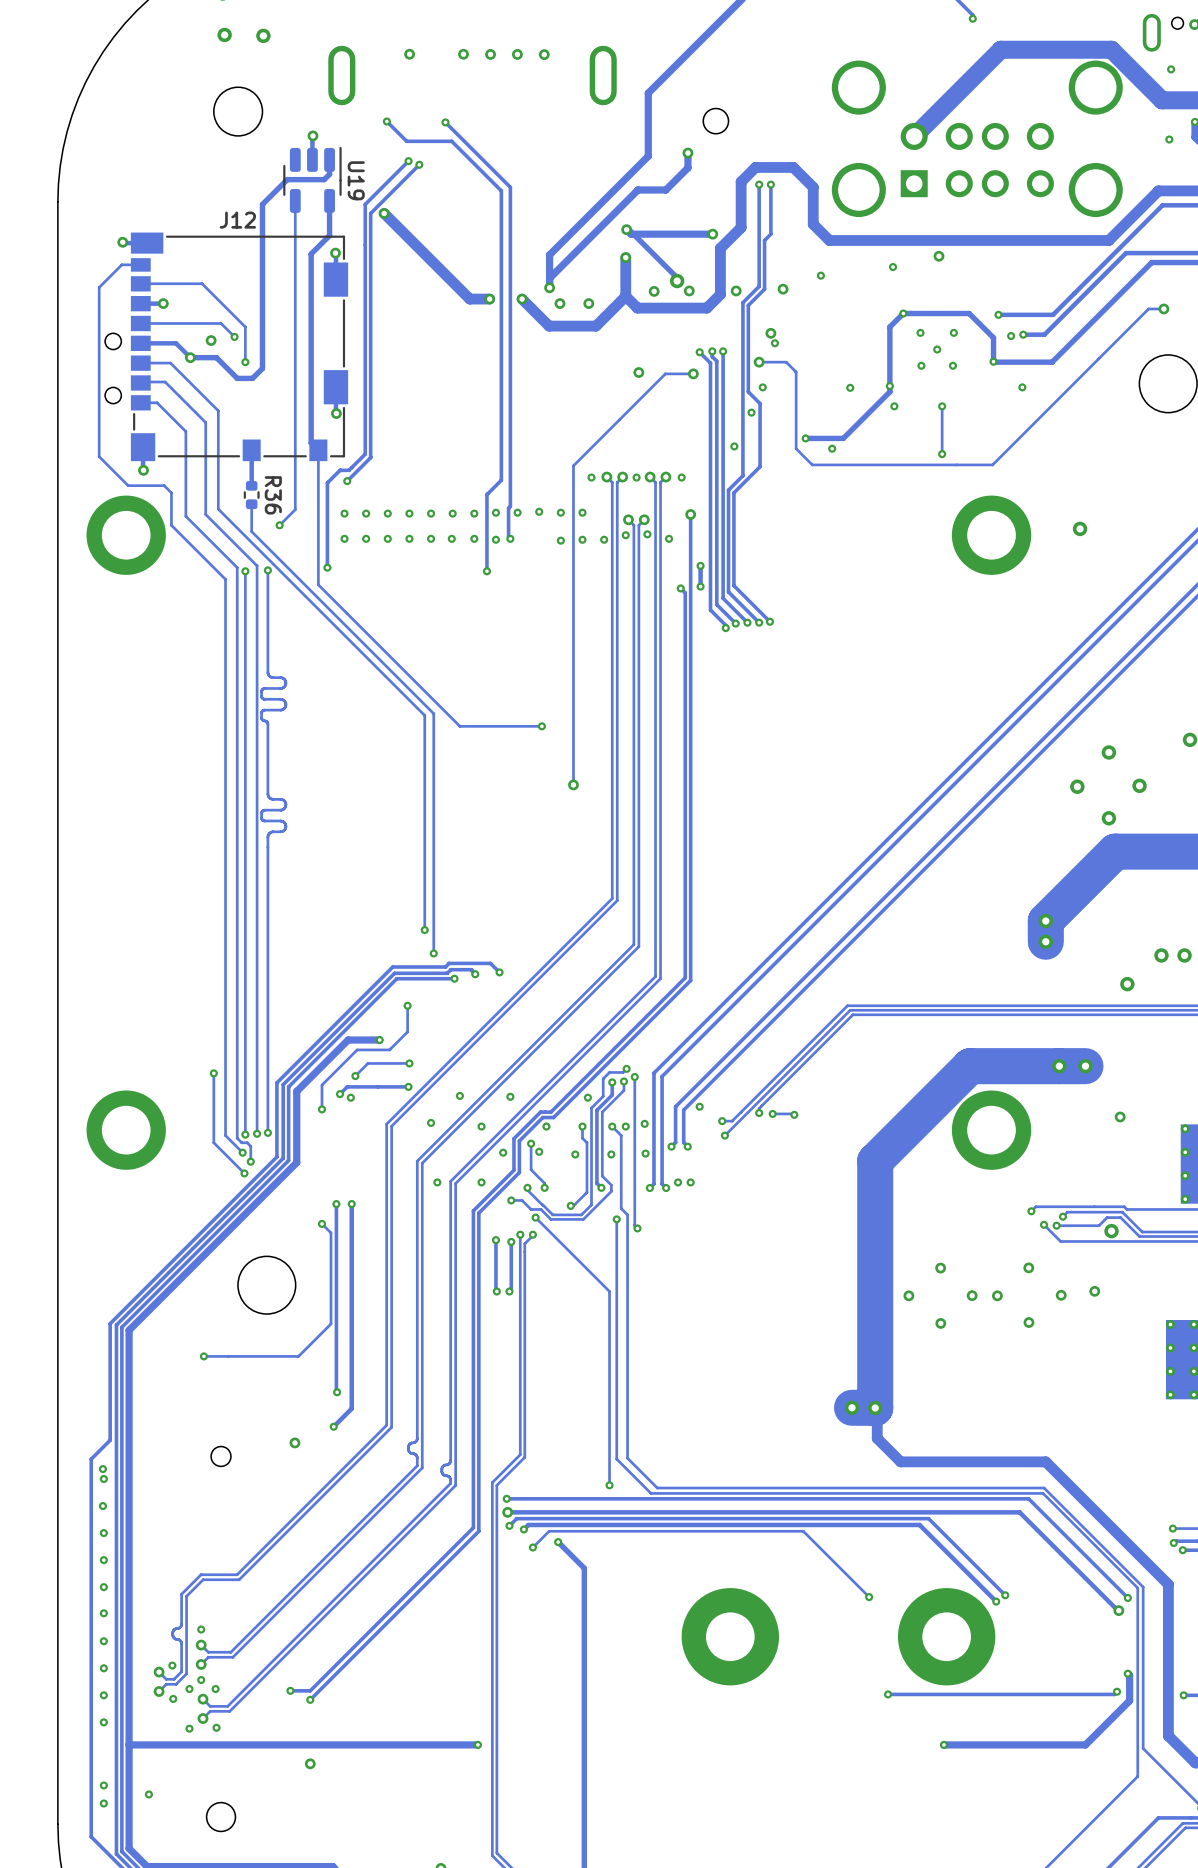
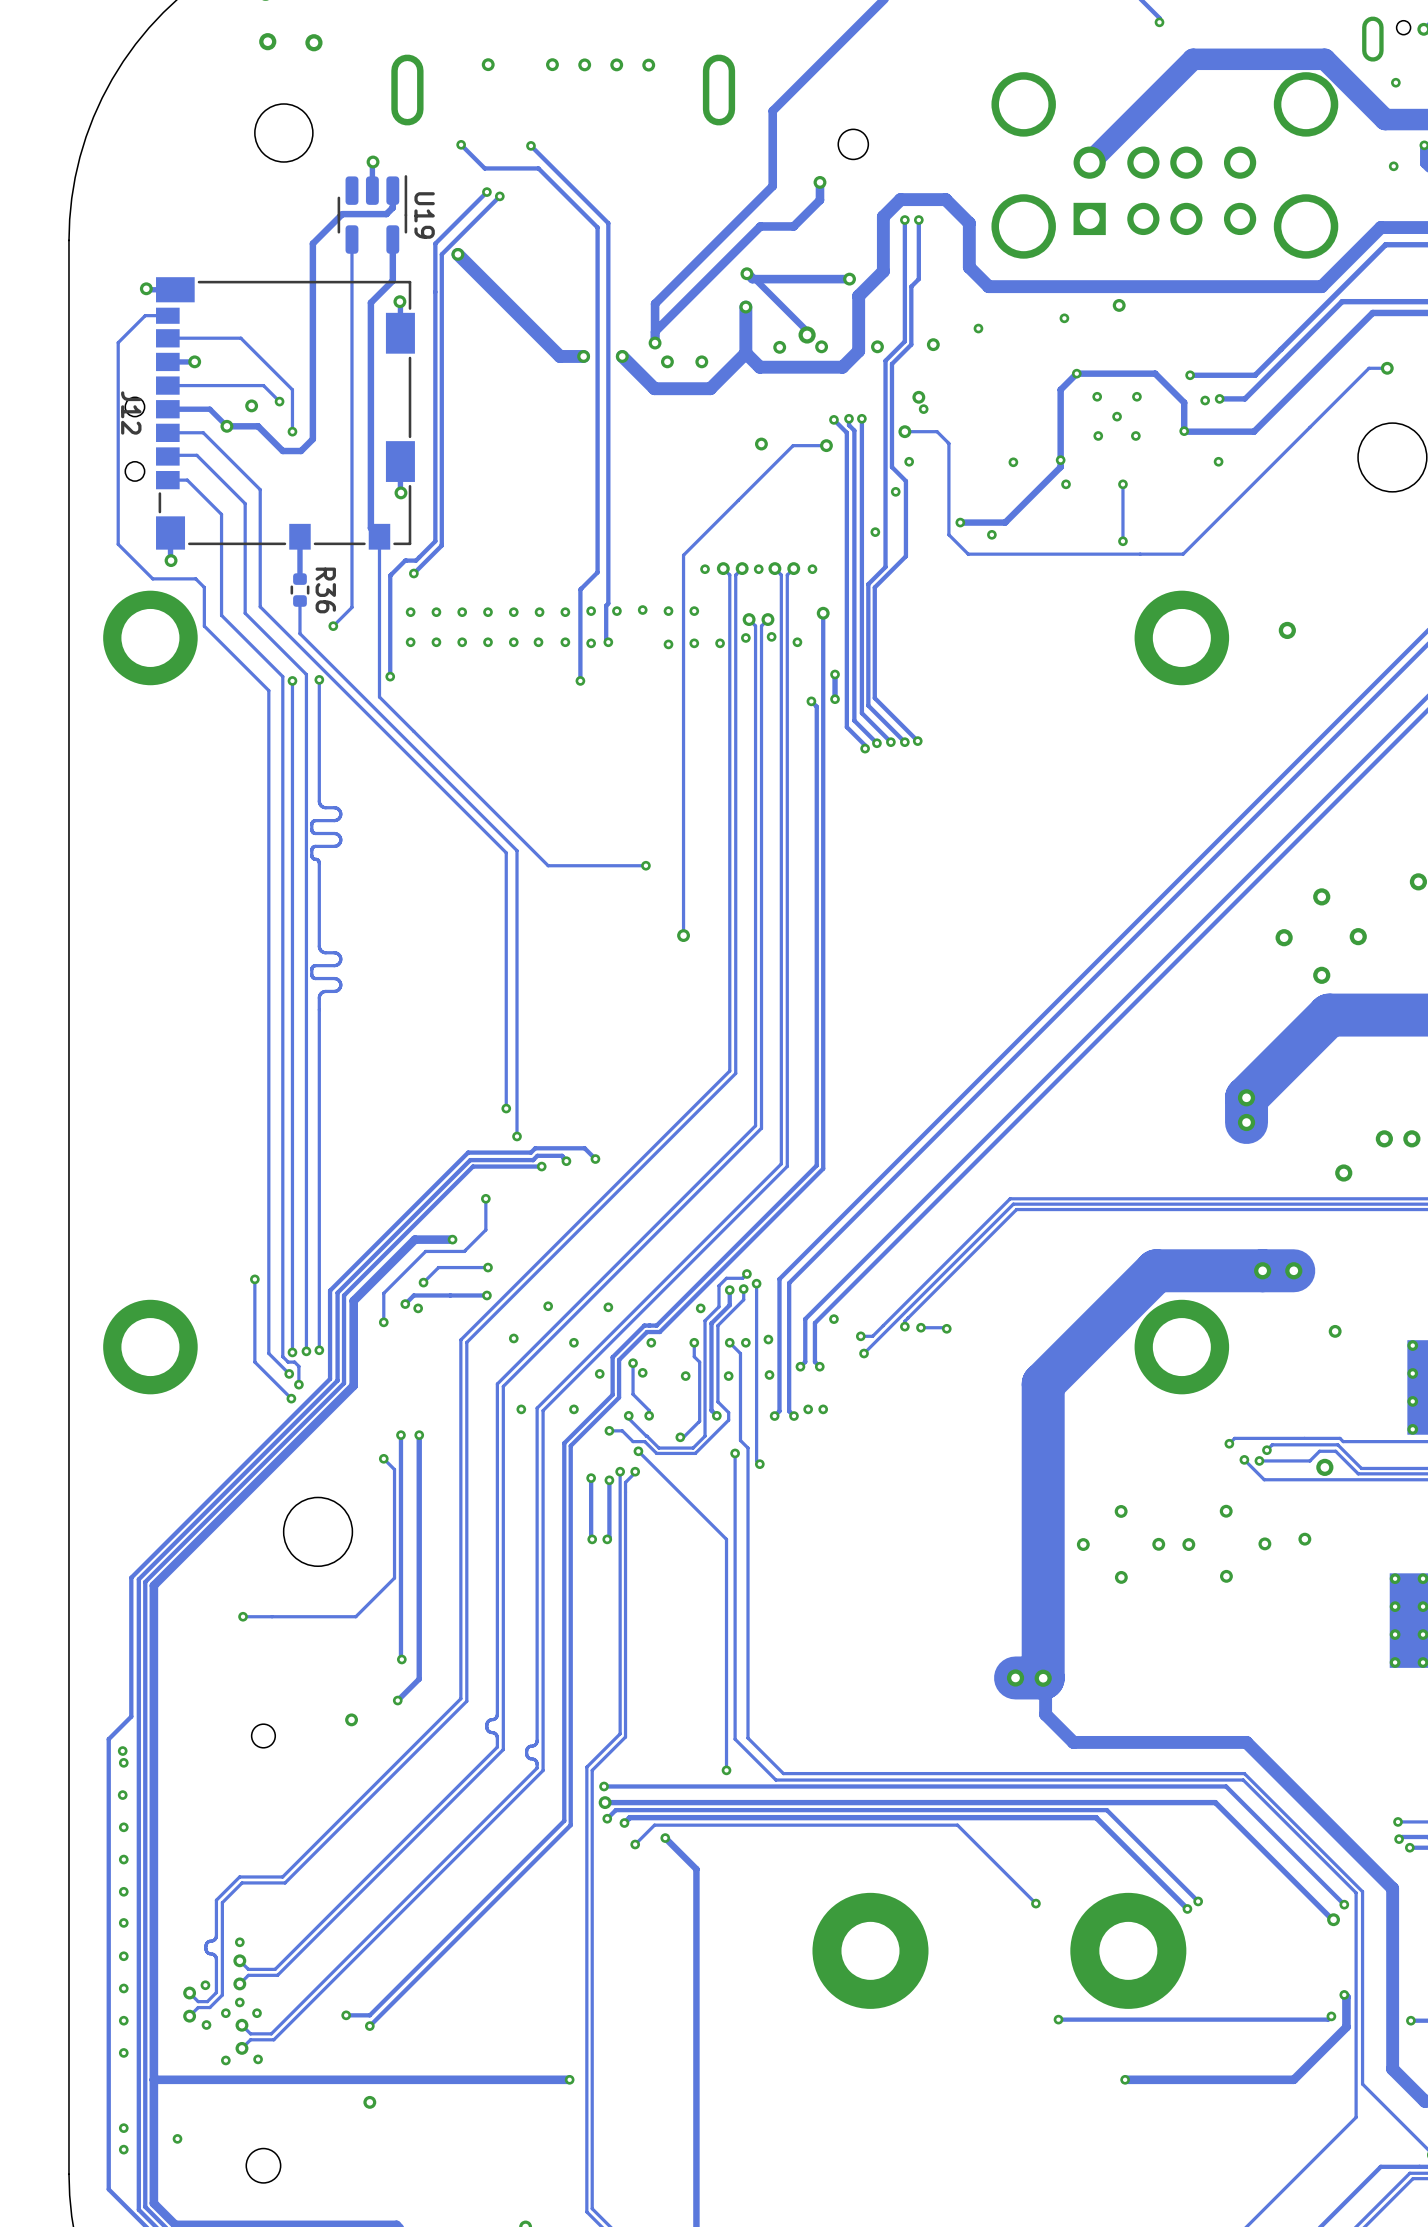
J12 name rotation: 0° (237, 220) -> 90° clockwise (131, 413)
J12 name position: J12 (237, 220) -> J12 (131, 413)

